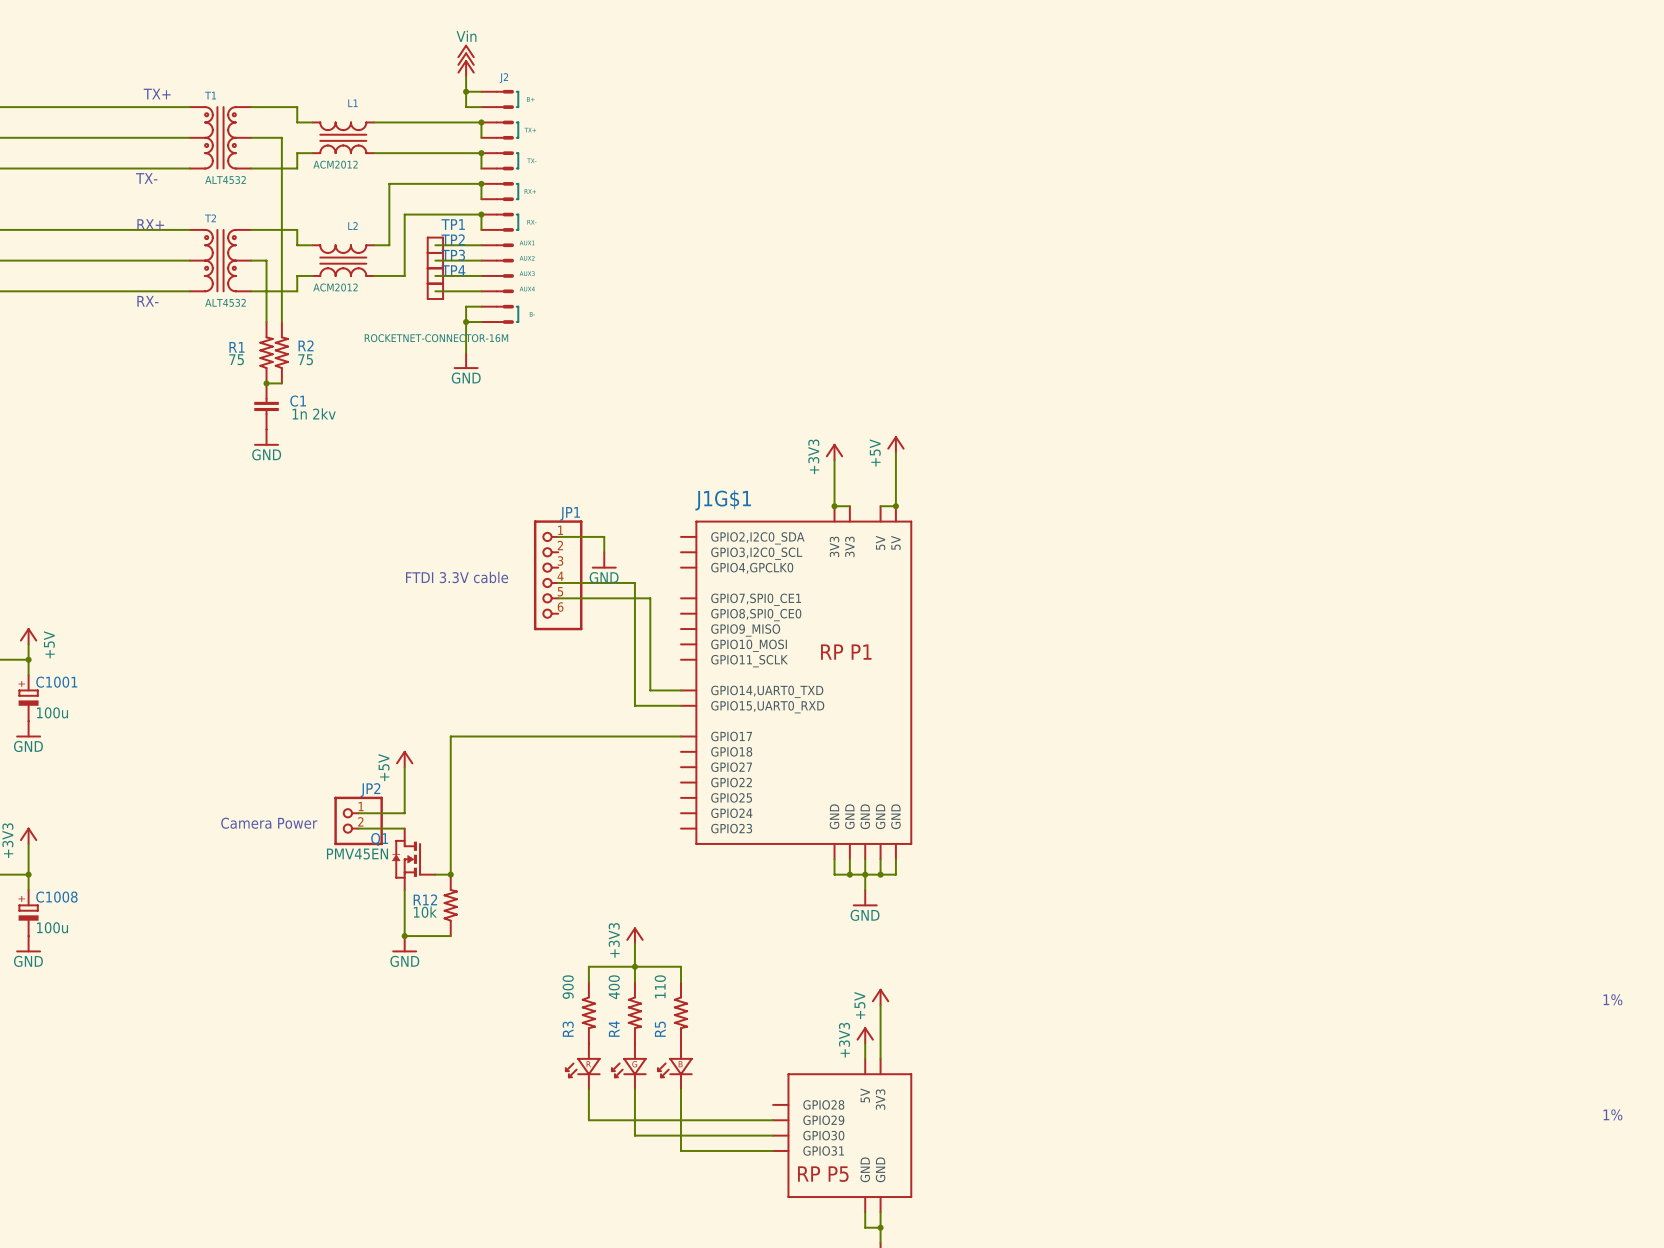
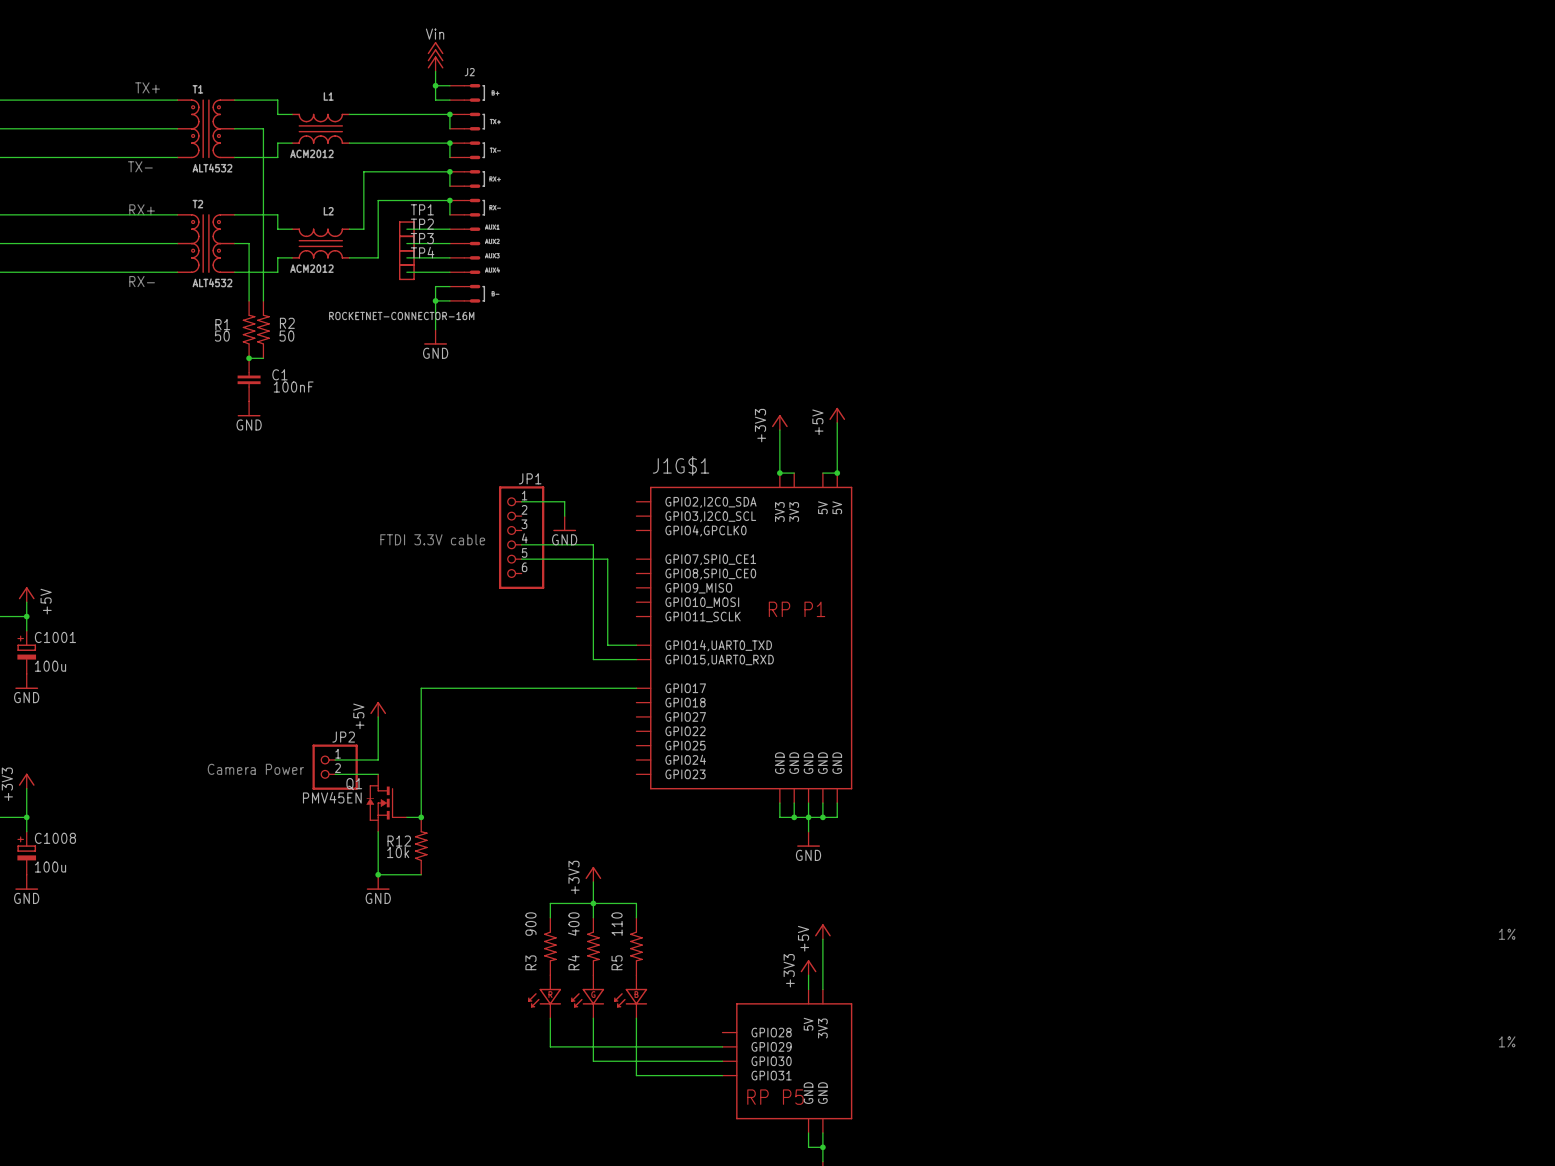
R1 value: 75 (236, 359) -> 50 (222, 336)
R2 value: 75 (305, 359) -> 50 (286, 336)
C1 value: 1n 2kv (314, 413) -> 100nF (293, 387)

